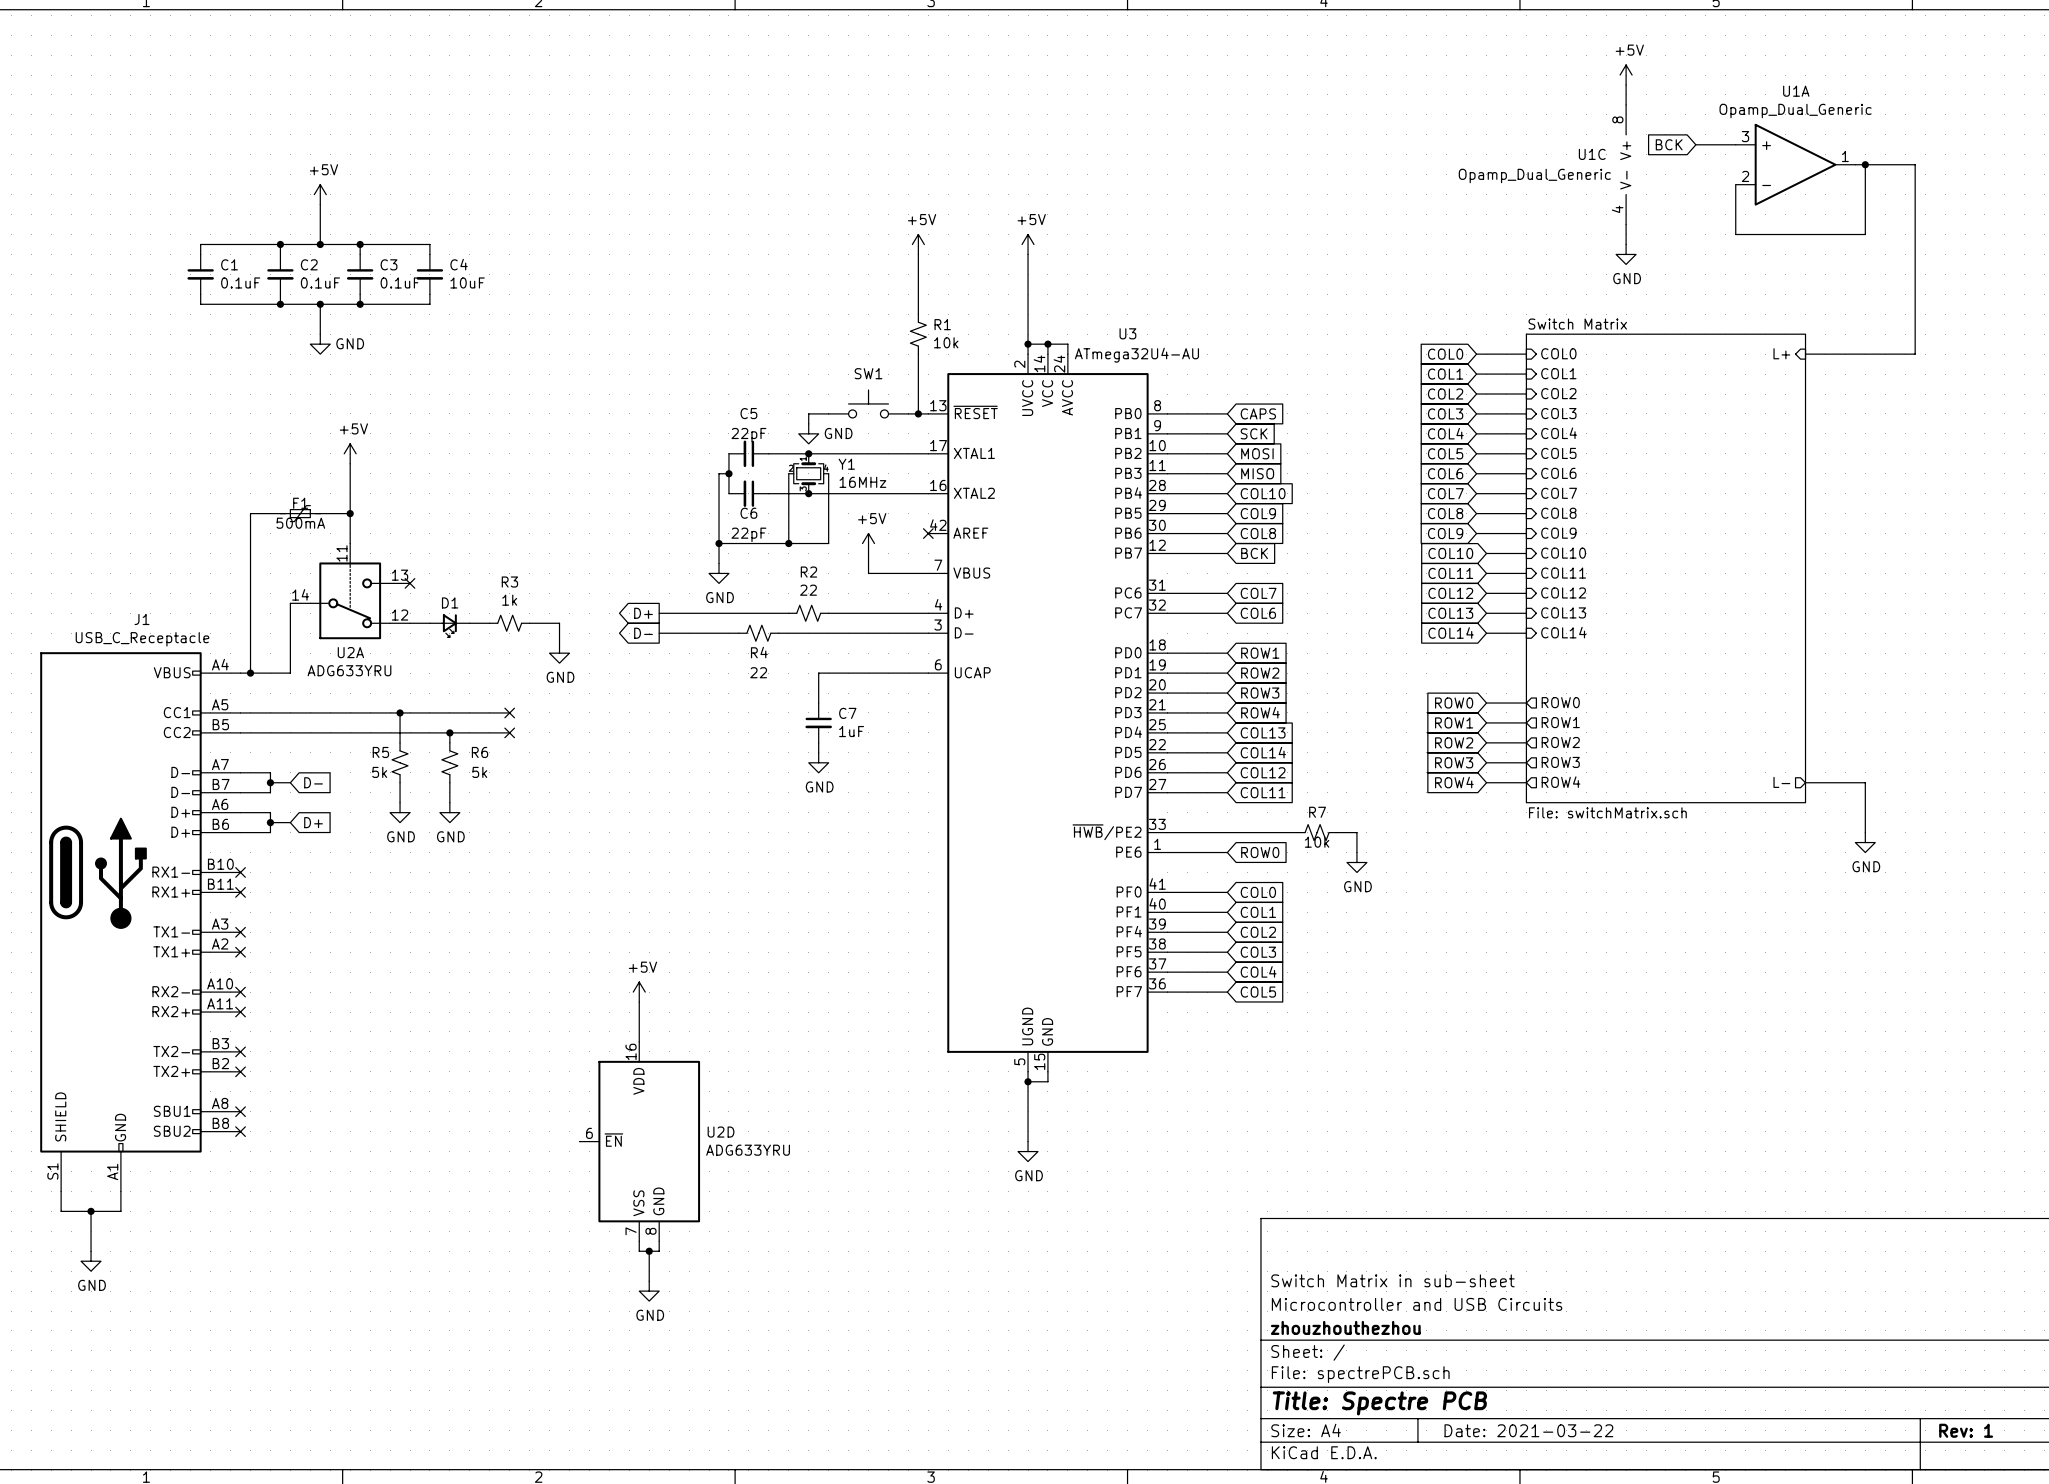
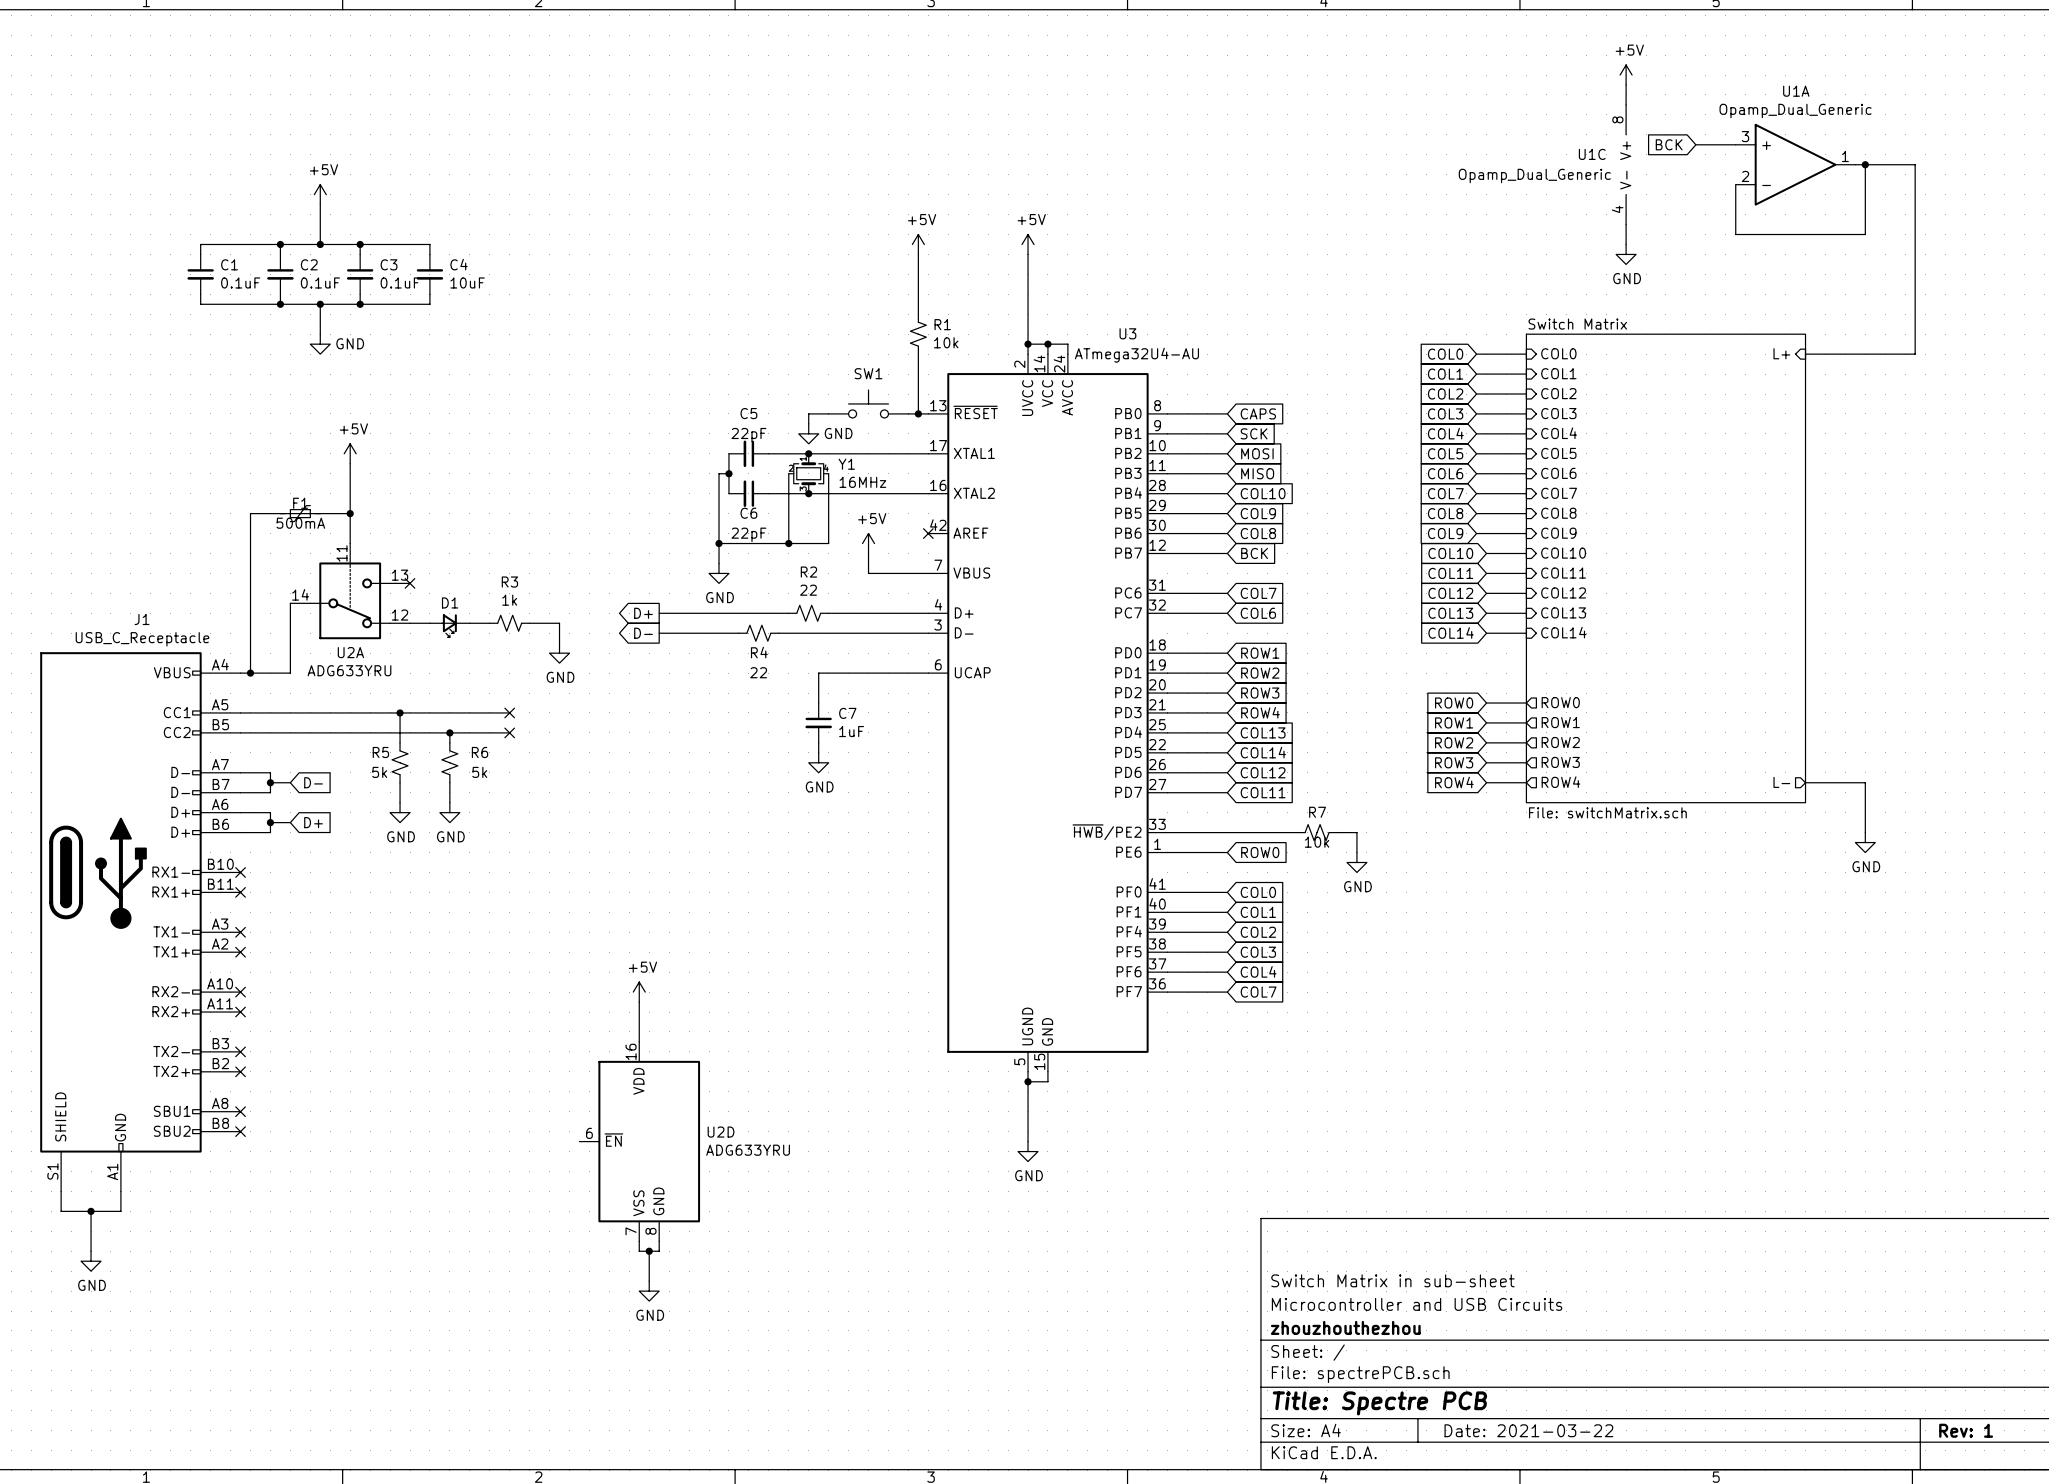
global label: COL5 (1258, 992) -> COL7 (1258, 992)

